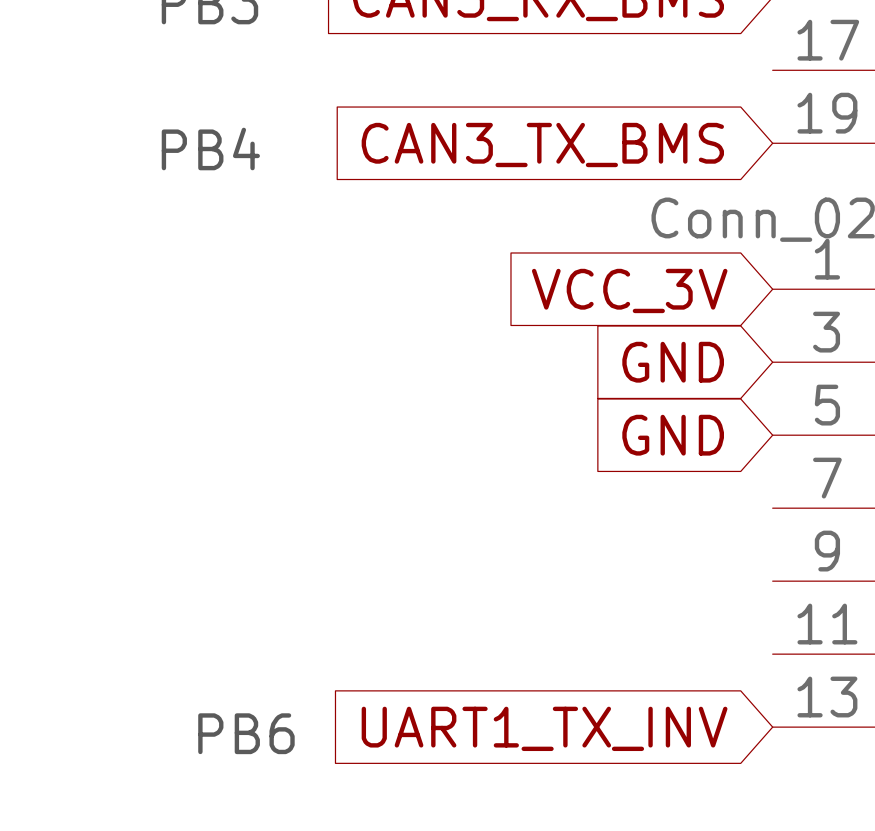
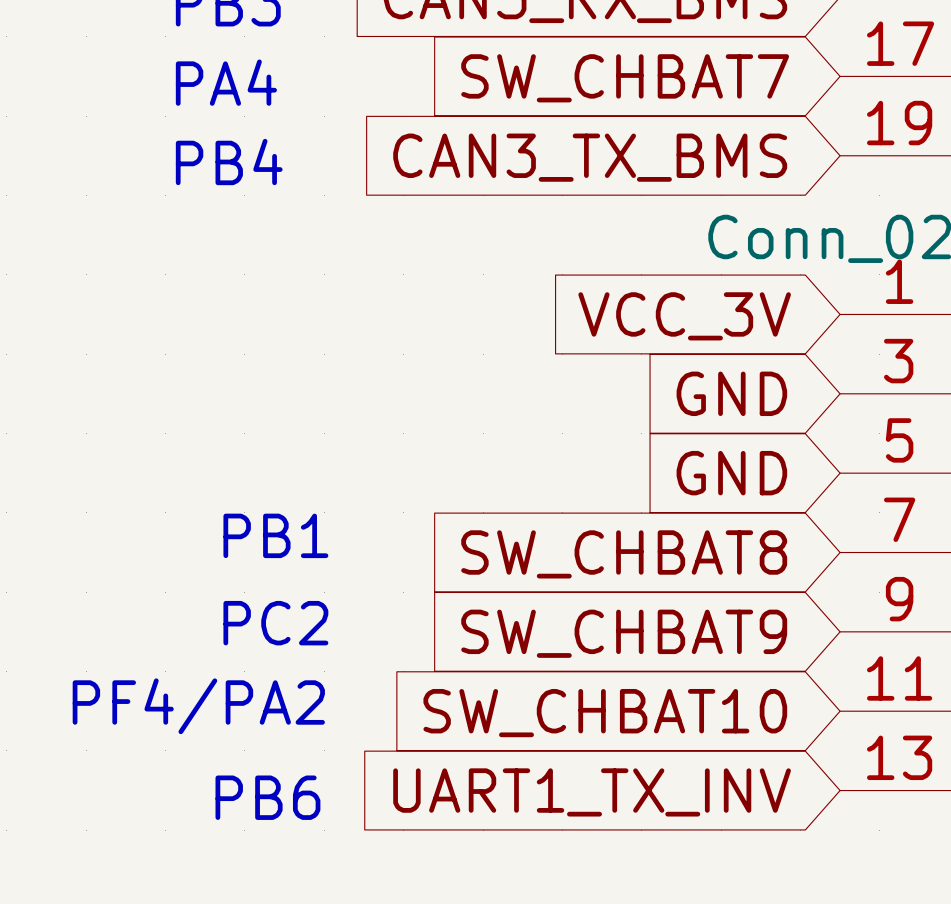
global label: none -> SW_CHBAT7 (625, 78)
text: none -> PA4 (226, 82)
text: none -> PB1 (275, 535)
global label: none -> SW_CHBAT8 (624, 554)
text: none -> PC2 (275, 623)
global label: none -> SW_CHBAT9 (624, 633)
text: none -> PF4/PA2 (198, 706)
global label: none -> SW_CHBAT10 (605, 713)

